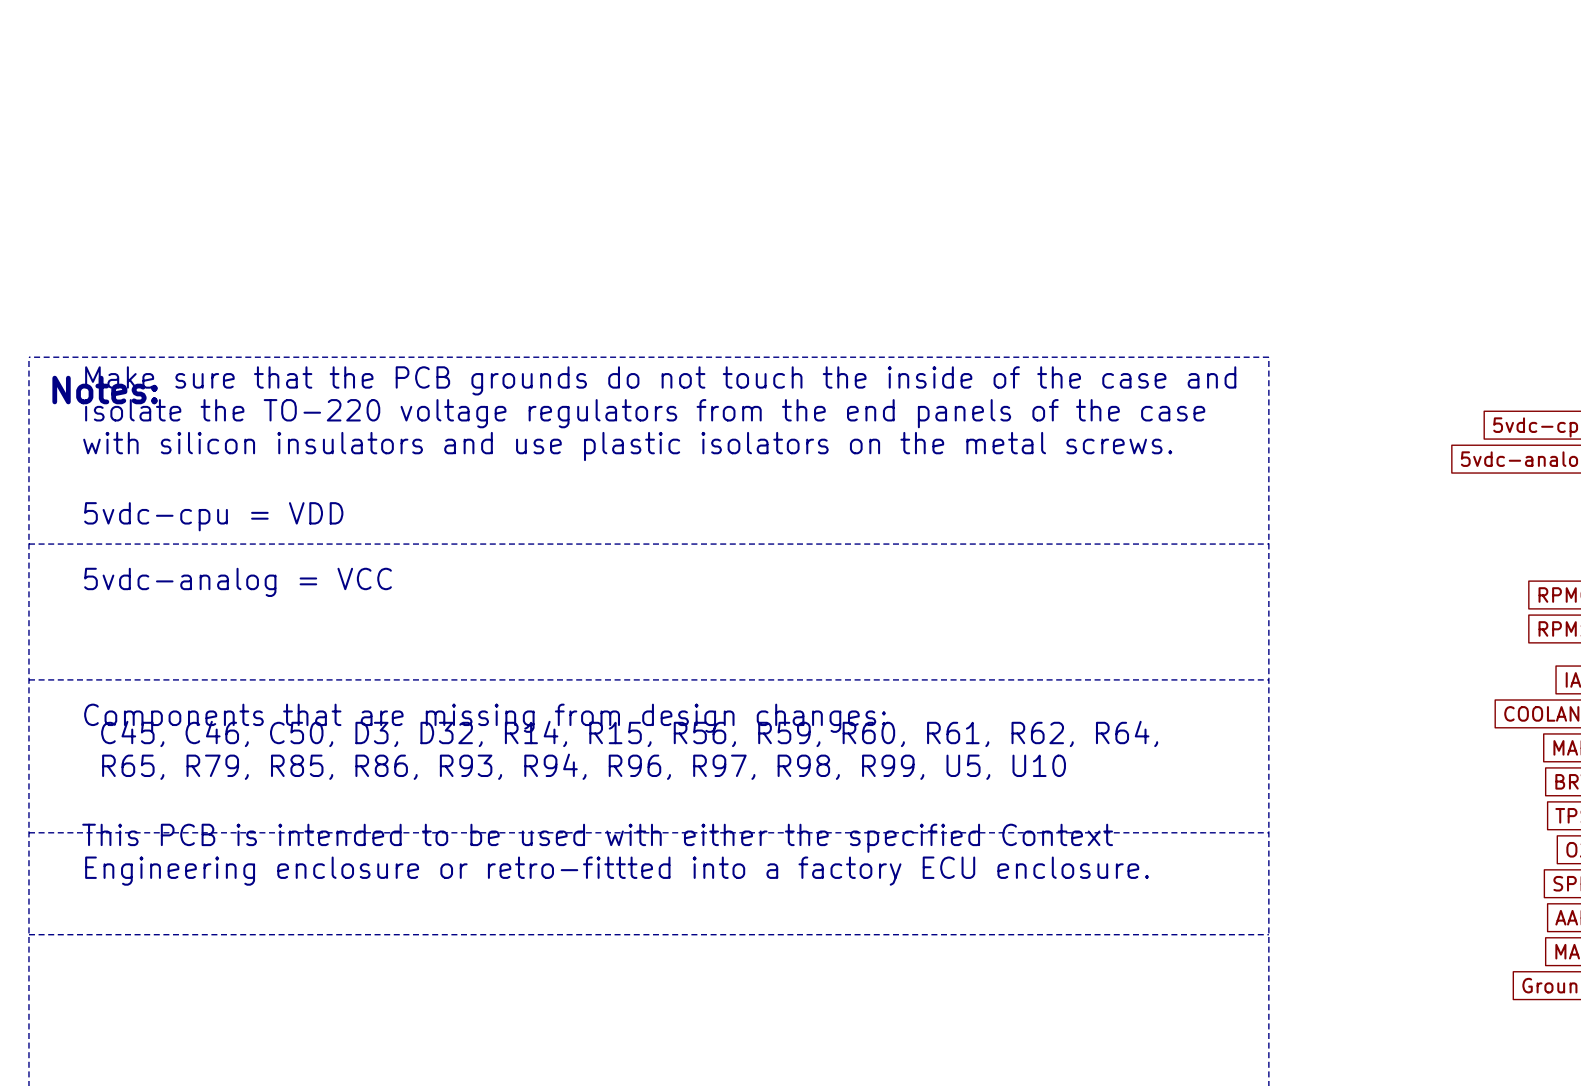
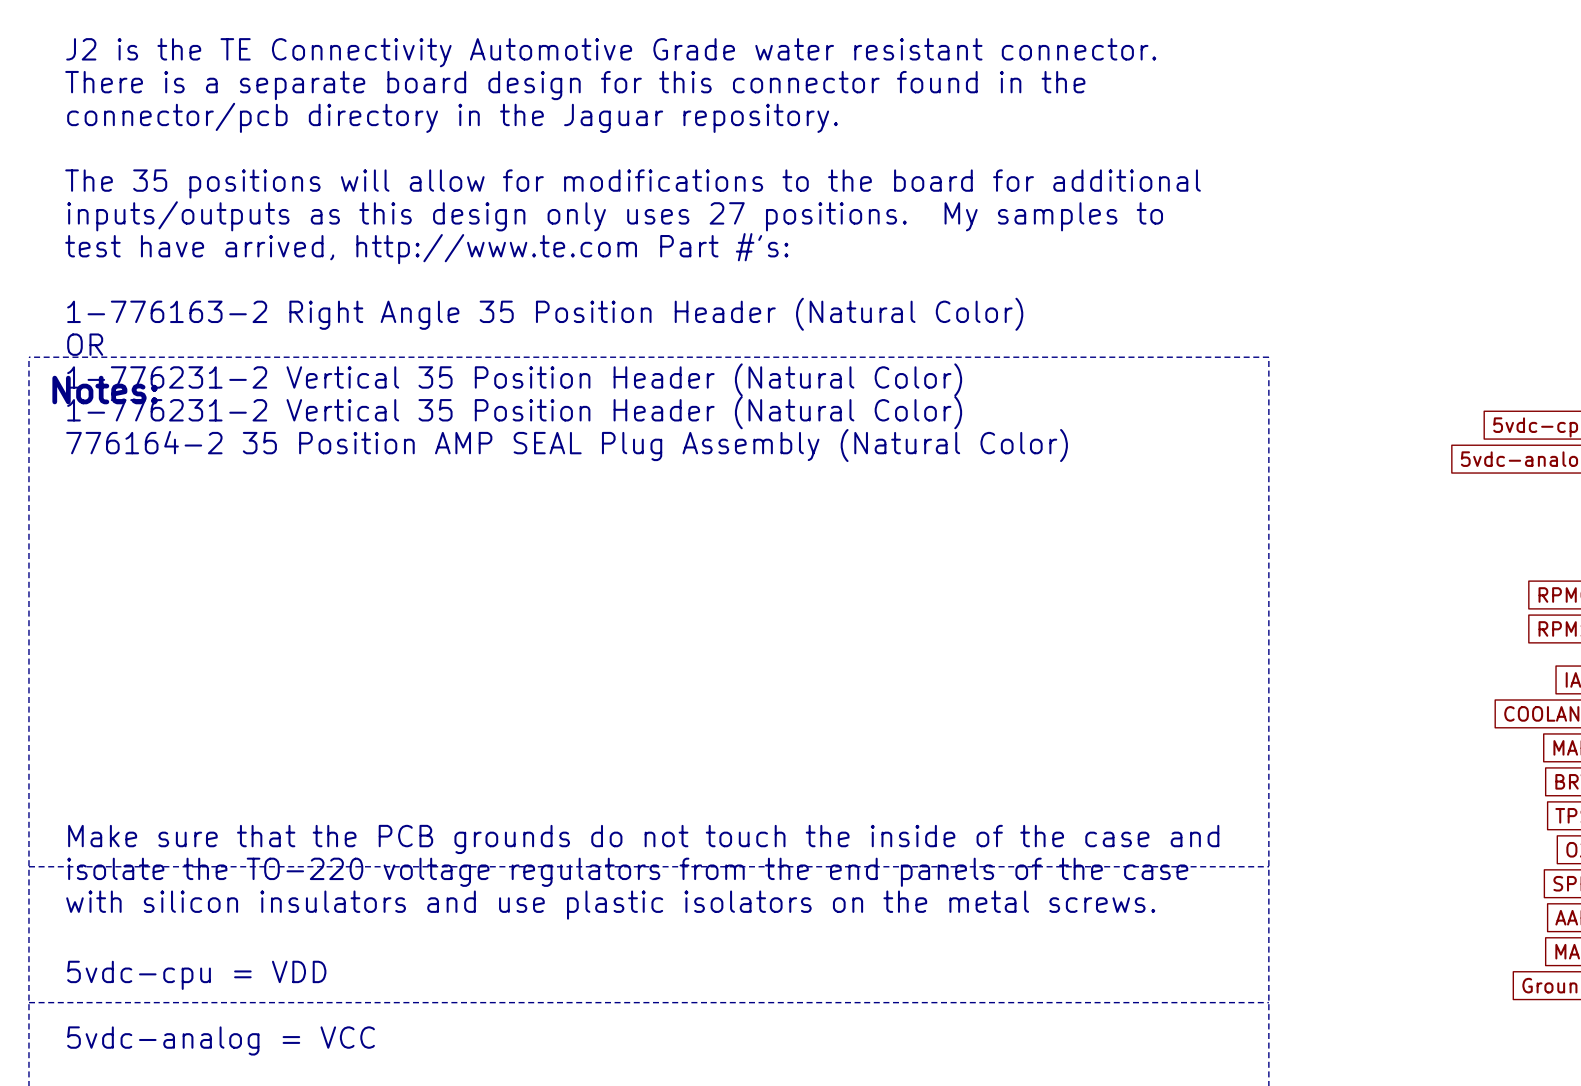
text: none -> J2 is the TE Connectivity Automotive Grade water resistant connector. (611, 52)
text: none -> There is a separate board design for this connector found in the (575, 85)
text: none -> connector/pcb directory in the Jaguar repository. (452, 117)
text: none -> The 35 positions will allow for modifications to the board for additional (633, 183)
text: none -> inputs/outputs as this design only uses 27 positions. My samples to (615, 216)
text: none -> test have arrived, http://www.te.com Part #'s: (426, 248)
text: none -> 1-776163-2 Right Angle 35 Position Header (Natural Color) (545, 314)
text: none -> OR (85, 344)
text: none -> 1-776231-2 Vertical 35 Position Header (Natural Color) (514, 379)
text: Make sure that the PCB grounds do not touch the inside of the case and (660, 380) -> none
text: none -> 1-776231-2 Vertical 35 Position Header (Natural Color) (514, 412)
text: isolate the TO-220 voltage regulators from the end panels of the case (644, 413) -> none
text: none -> 776164-2 35 Position AMP SEAL Plug Assembly (Natural Color) (567, 445)
text: with silicon insulators and use plastic isolators on the metal screws. (627, 446) -> none
text: 5vdc-cpu = VDD (213, 516) -> none
line: (28, 544) (1268, 544) -> (28, 866) (1268, 866)
text: 5vdc-analog = VCC (238, 582) -> none
line: (28, 679) (1268, 679) -> (28, 1002) (1268, 1002)
text: Components that are missing from design changes: (485, 718) -> none
text: C45, C46, C50, D3, D32, R14, R15, R56, R59, R60, R61, R62, R64, (629, 733) -> none
text: R65, R79, R85, R86, R93, R94, R96, R97, R98, R99, U5, U10 (584, 766) -> none
line: (28, 832) (1268, 832) -> none
text: This PCB is intended to be used with either the specified Context (597, 838) -> none
text: none -> Make sure that the PCB grounds do not touch the inside of the case and (643, 839)
text: Engineering enclosure or retro-fittted into a factory ECU enclosure. (617, 871) -> none
text: none -> isolate the TO-220 voltage regulators from the end panels of the case (627, 872)
text: none -> with silicon insulators and use plastic isolators on the metal screws. (610, 905)
line: (28, 934) (1268, 934) -> none
text: none -> 5vdc-cpu = VDD (196, 975)
text: none -> 5vdc-analog = VCC (221, 1040)

